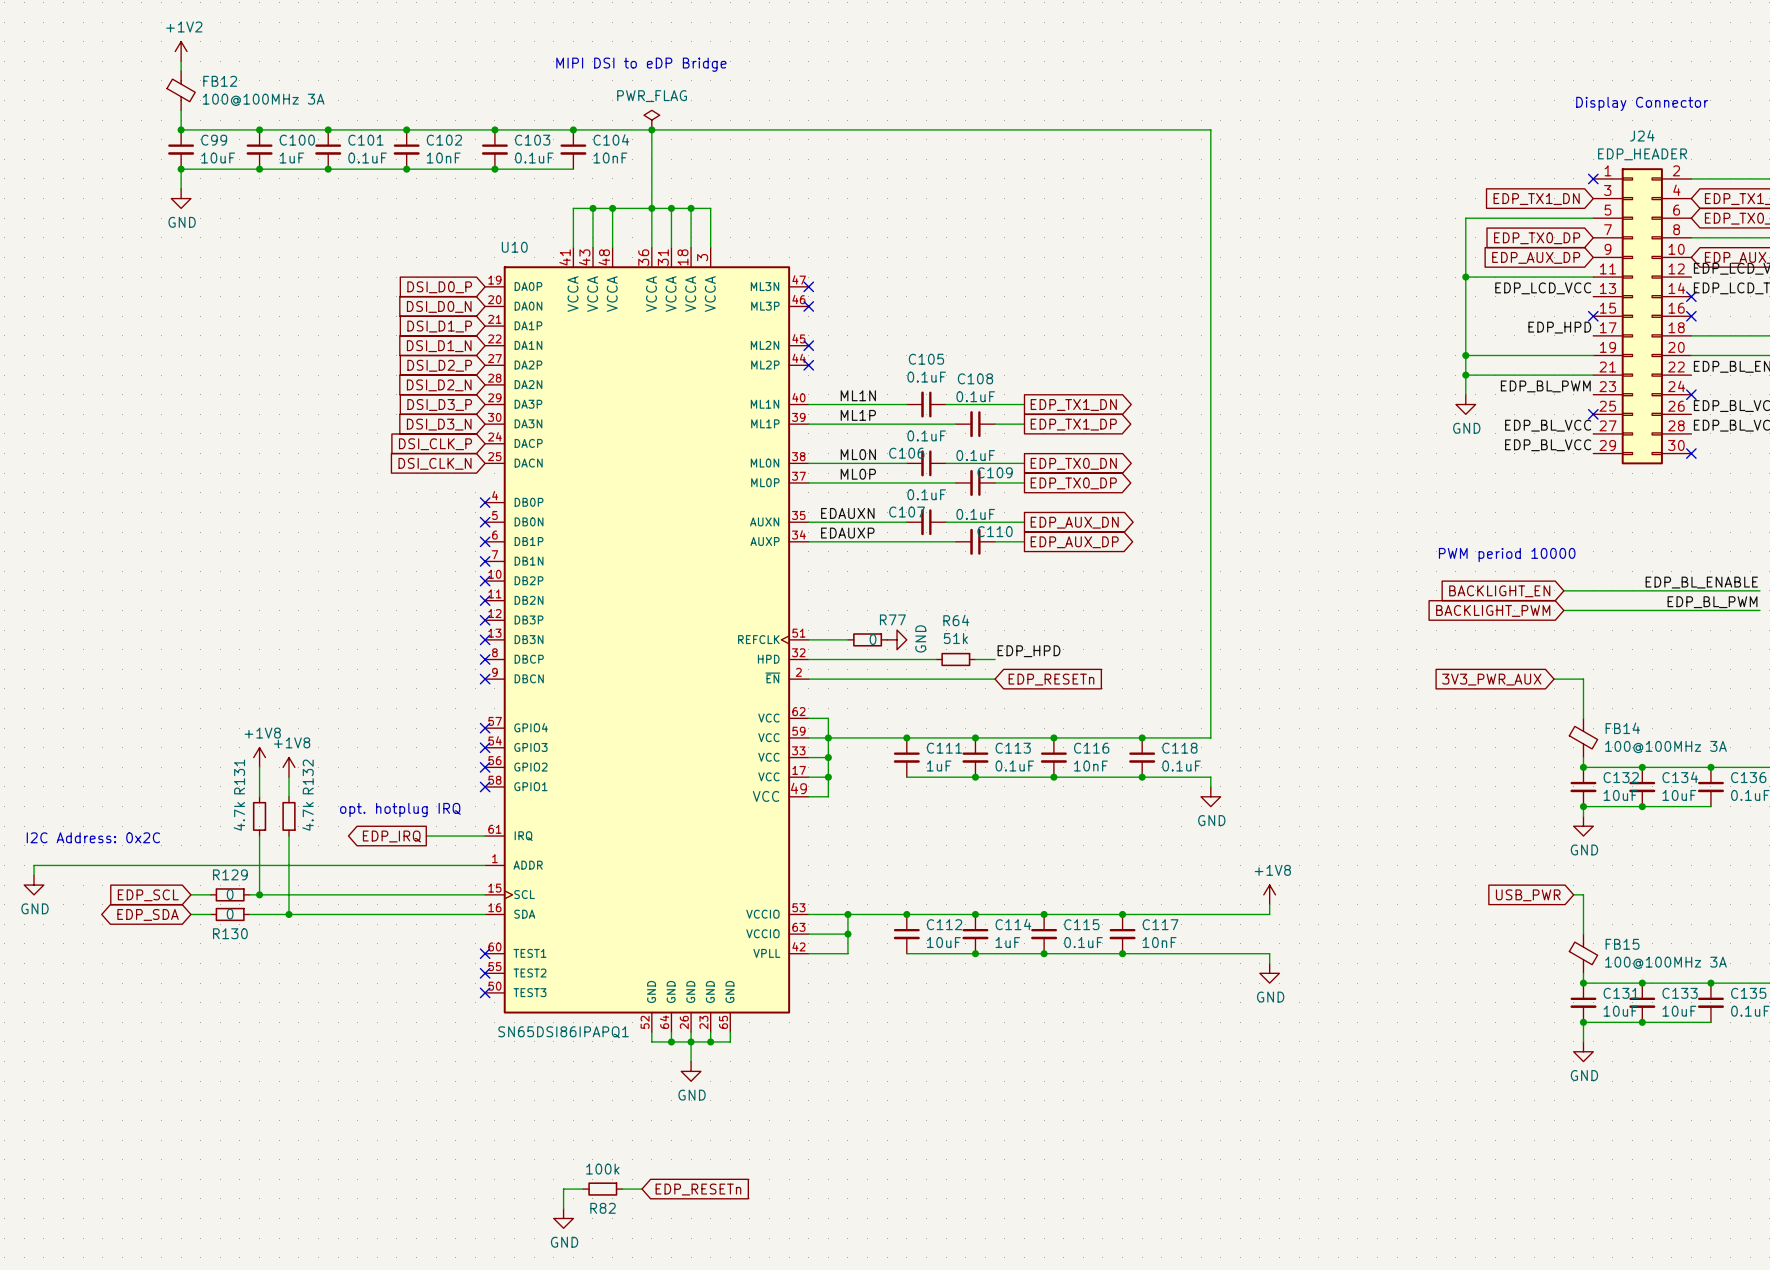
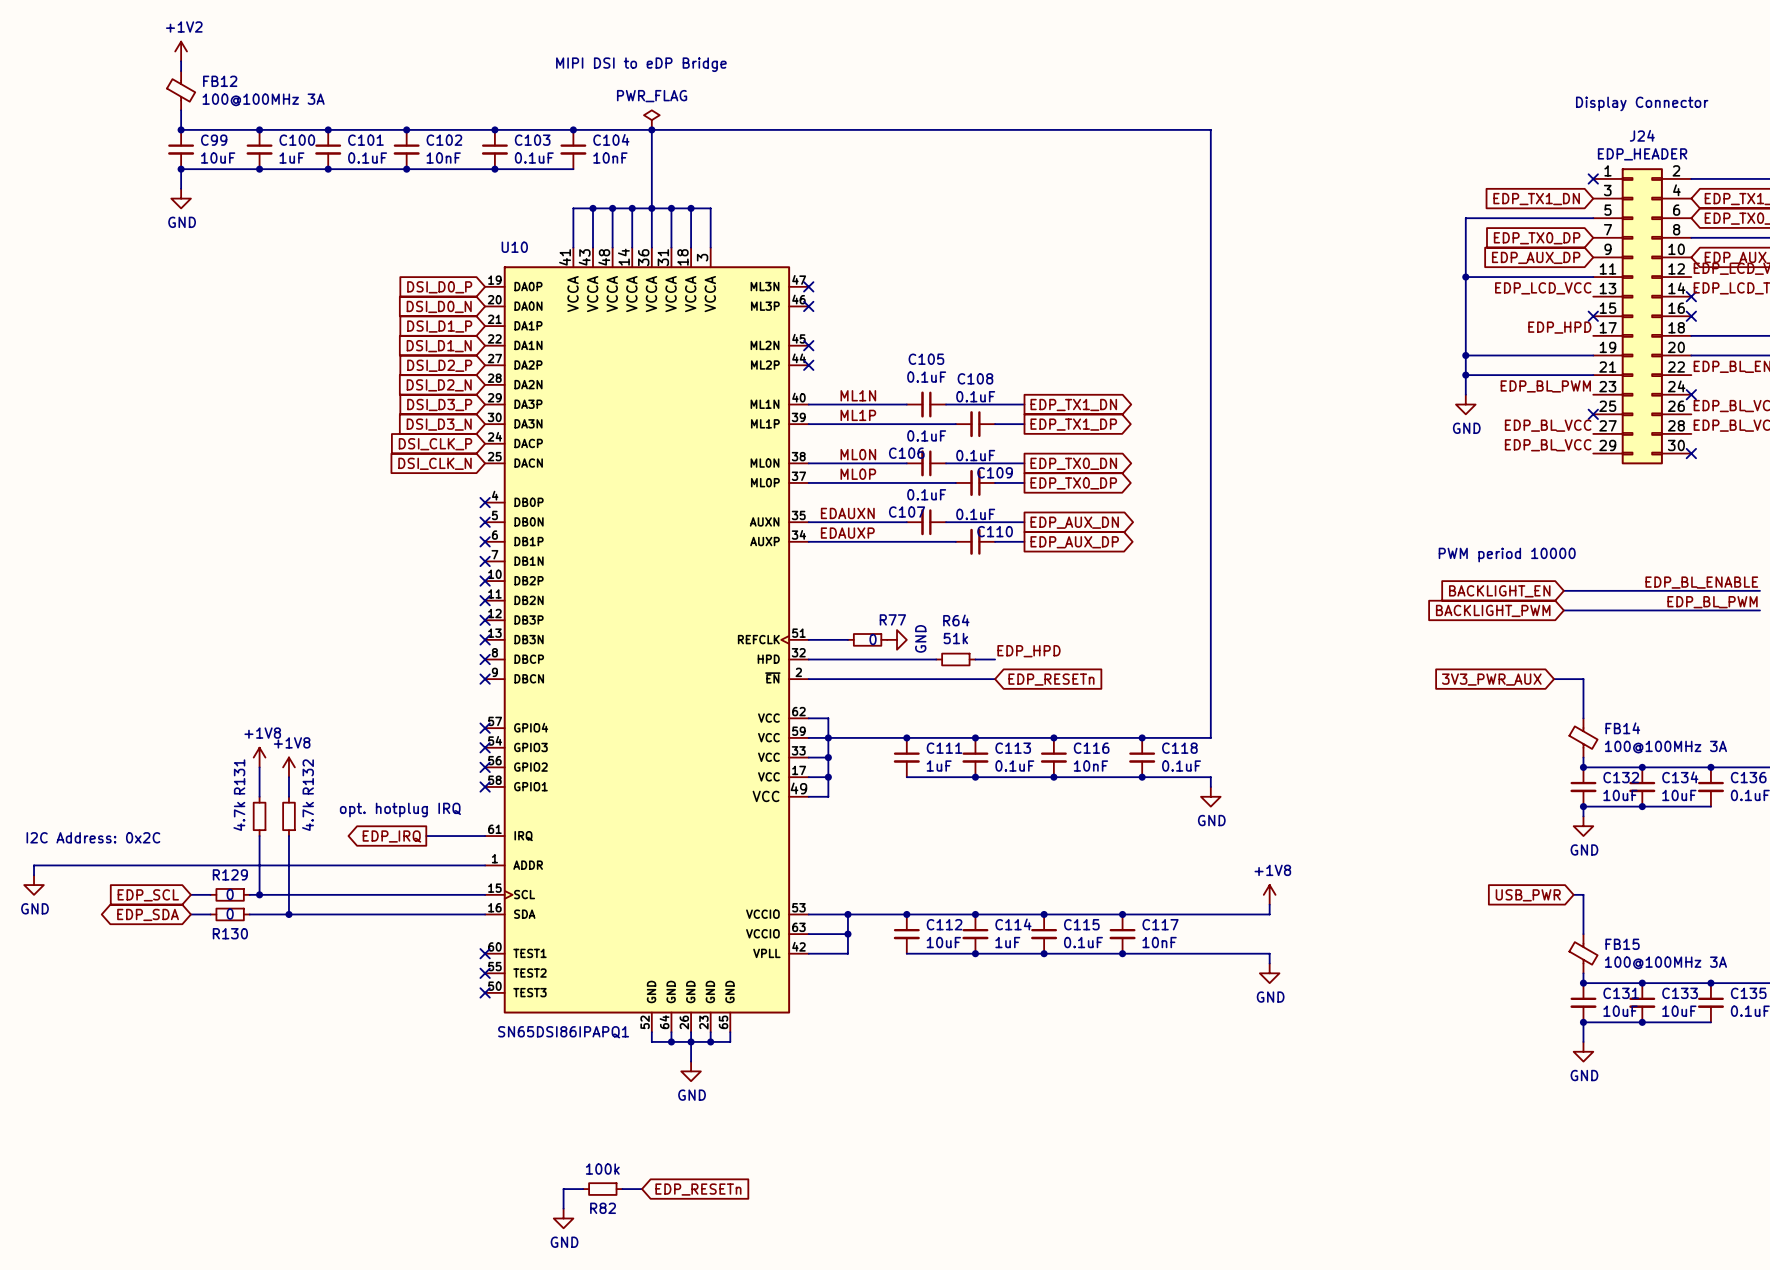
wire: none -> (632, 208) (632, 247)
junction: none -> (632, 208)
U10 symbol: [485, 247, 809, 1033] -> [485, 247, 809, 1033]

